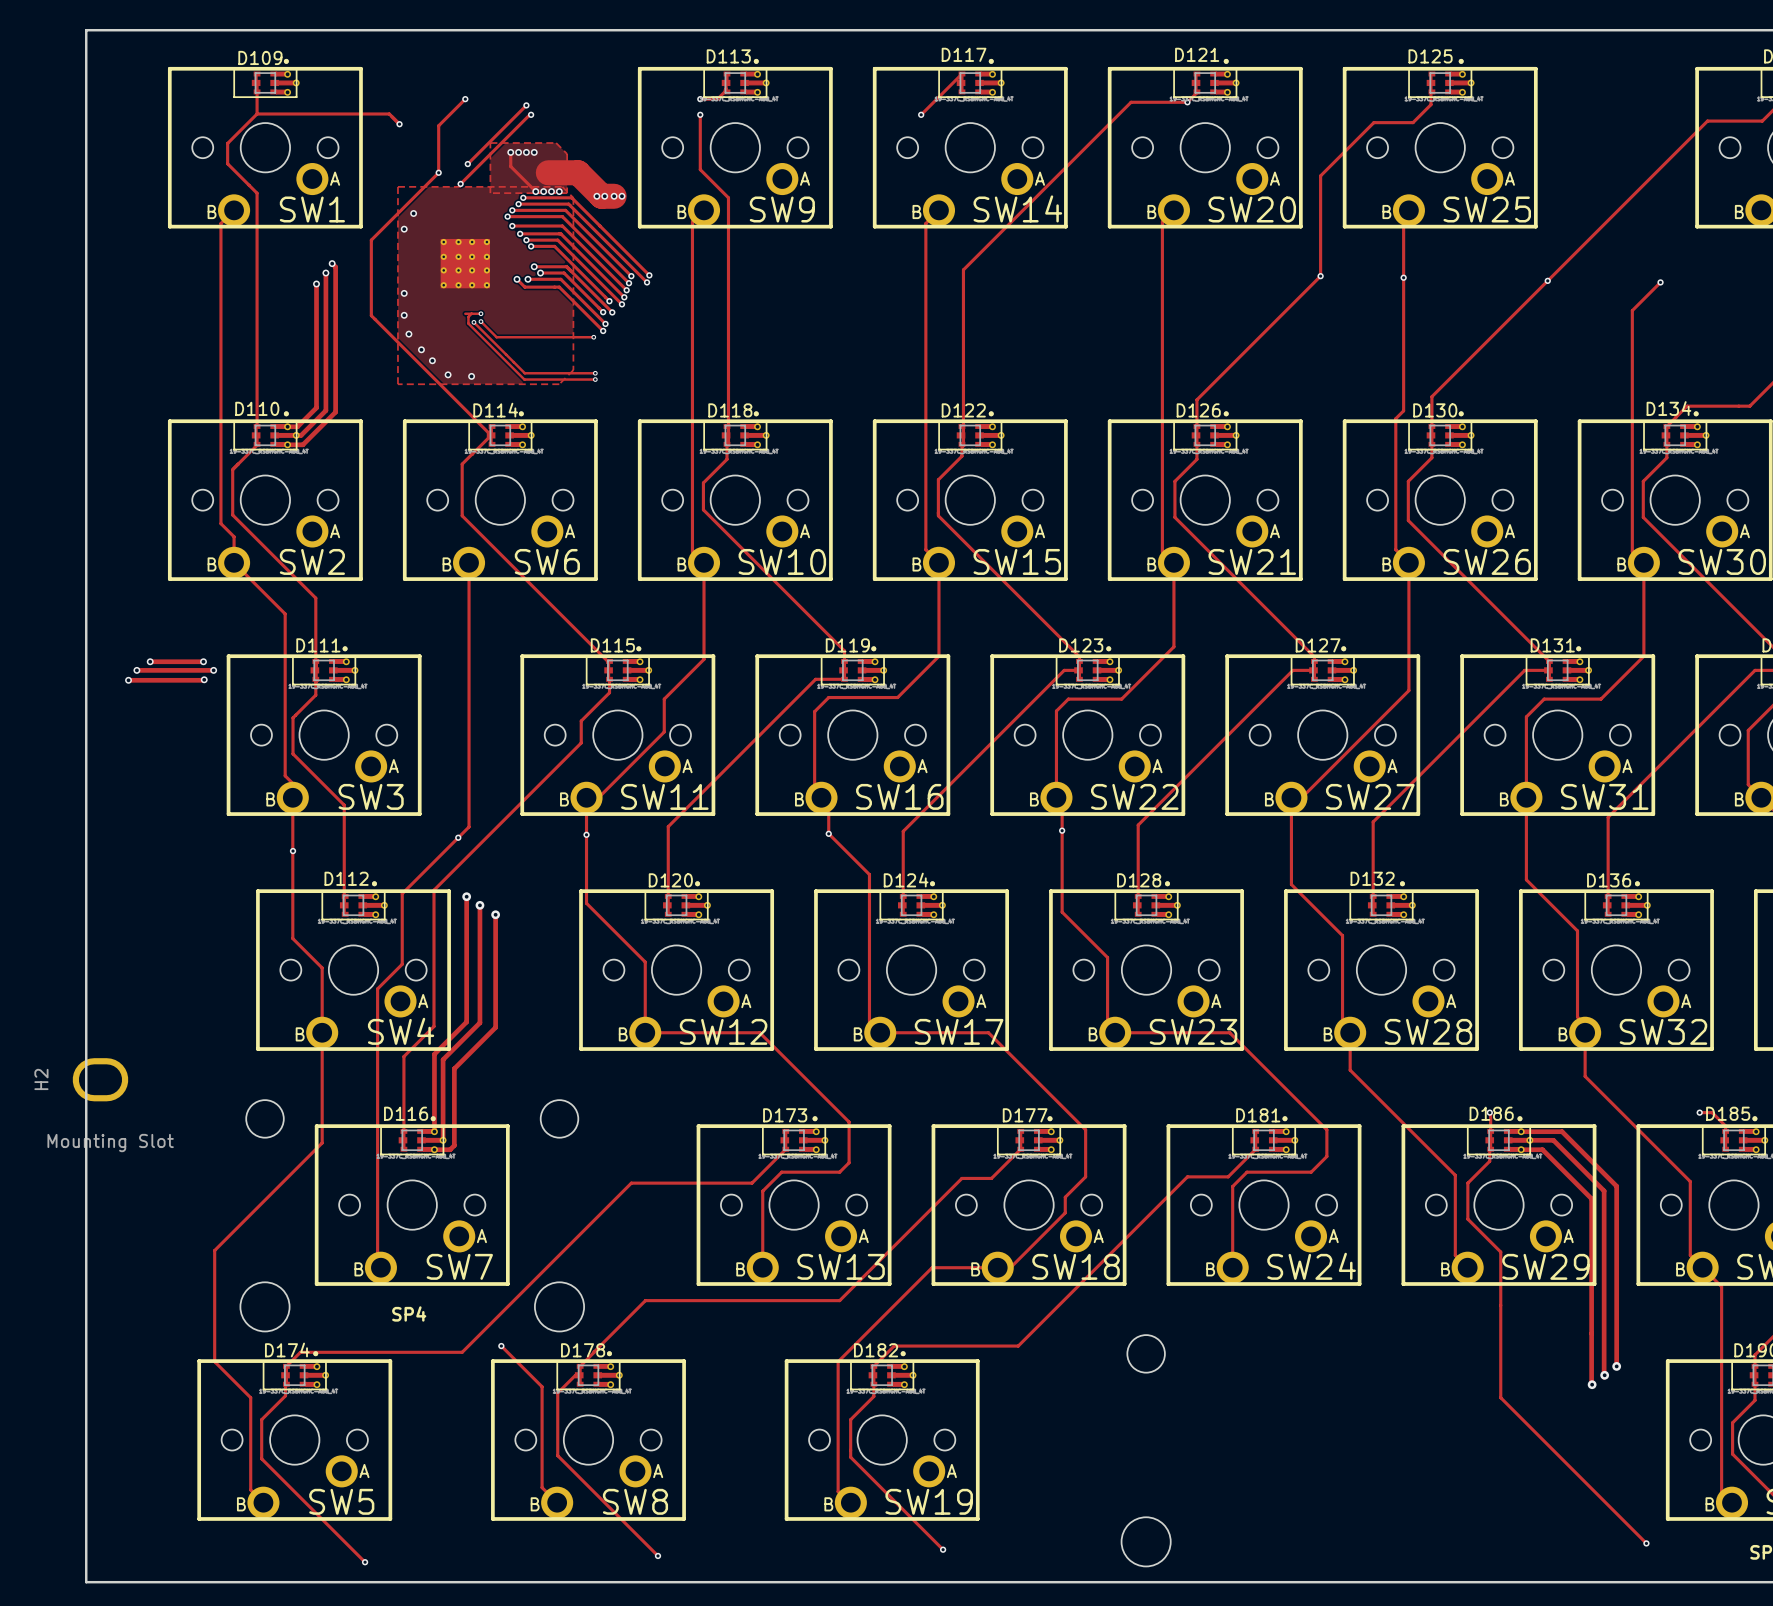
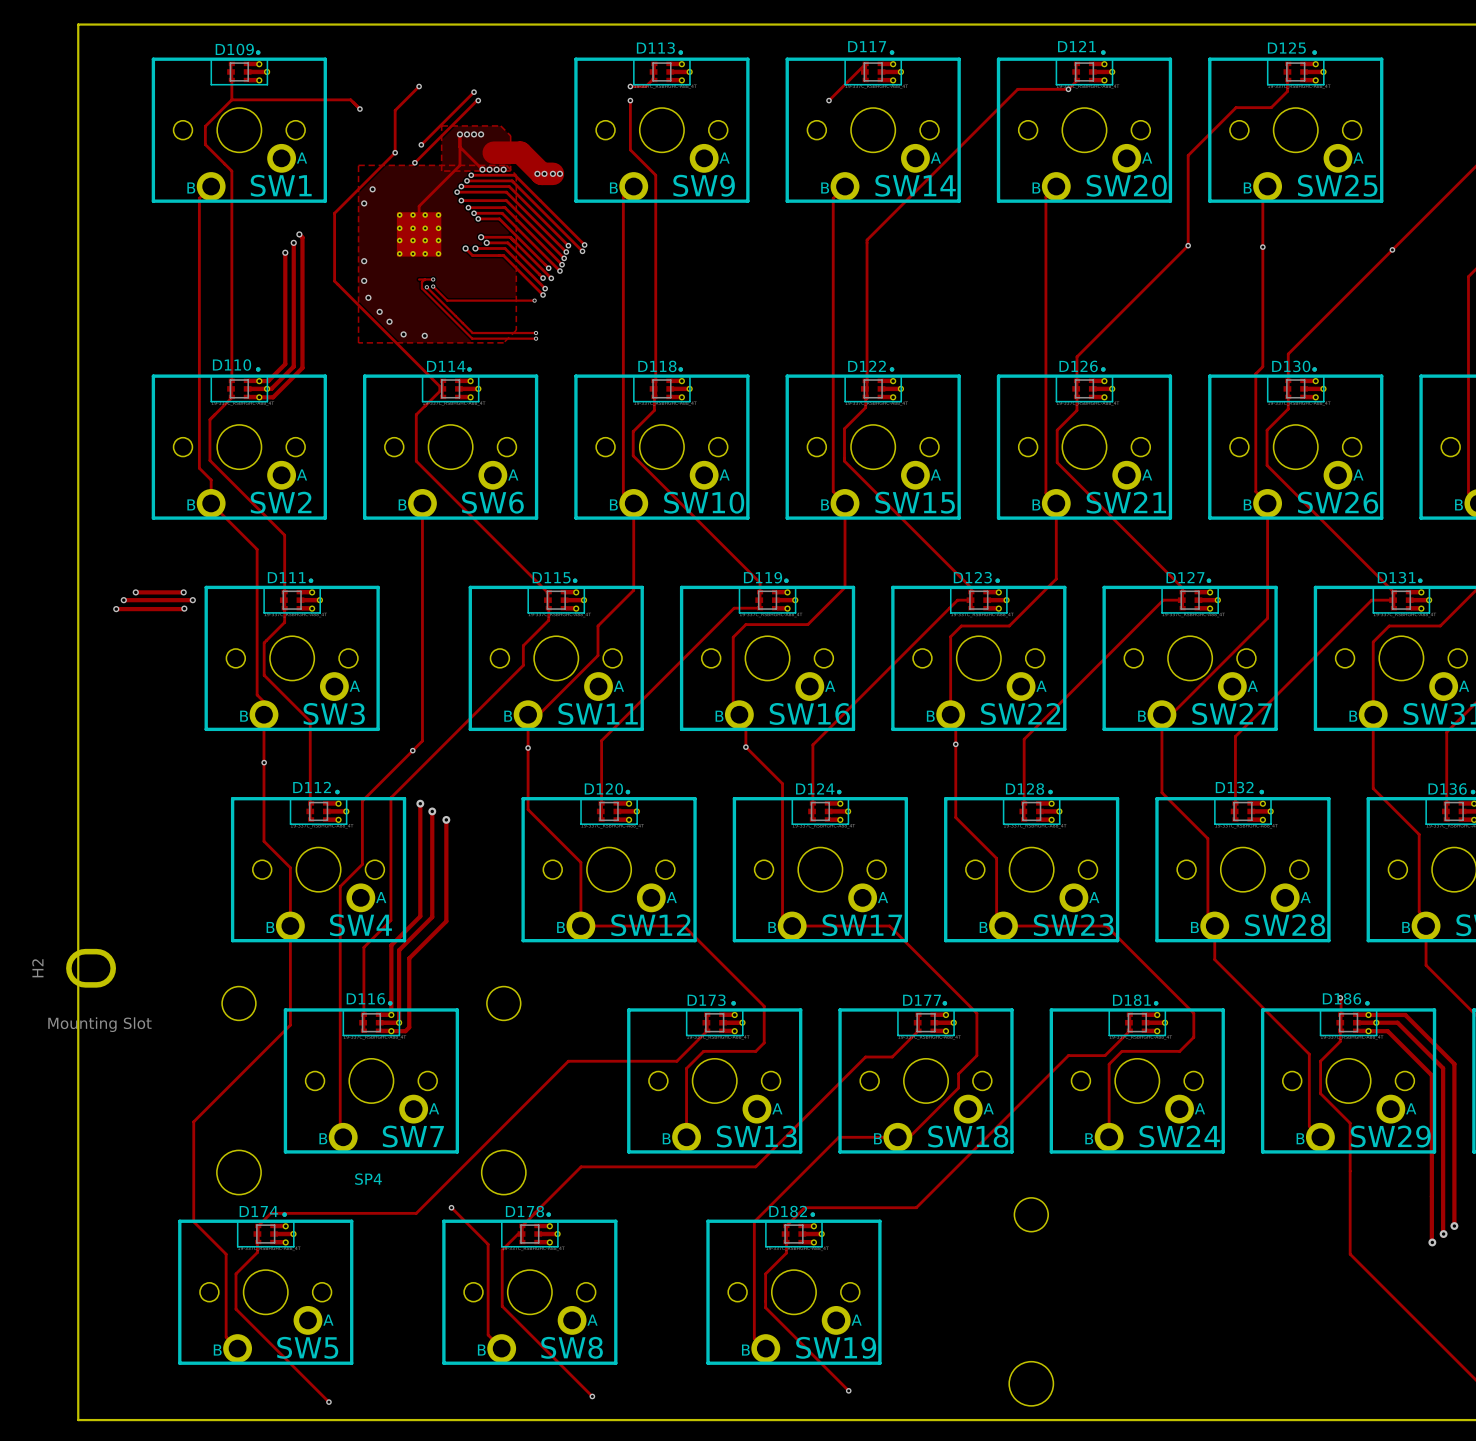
track: none -> (459, 147) (459, 165) (419, 206) (419, 234)

